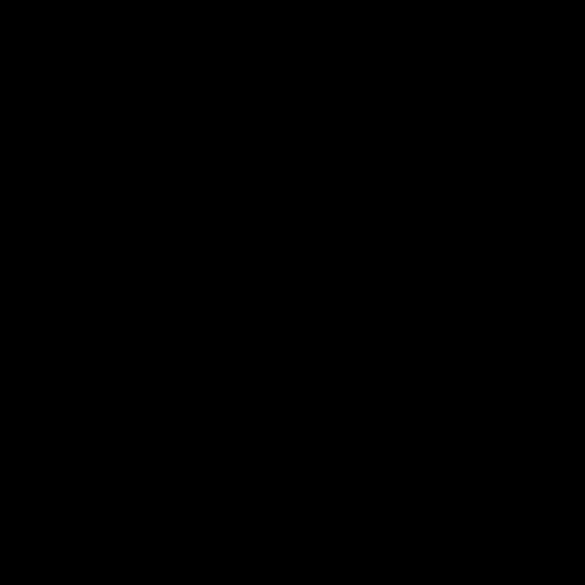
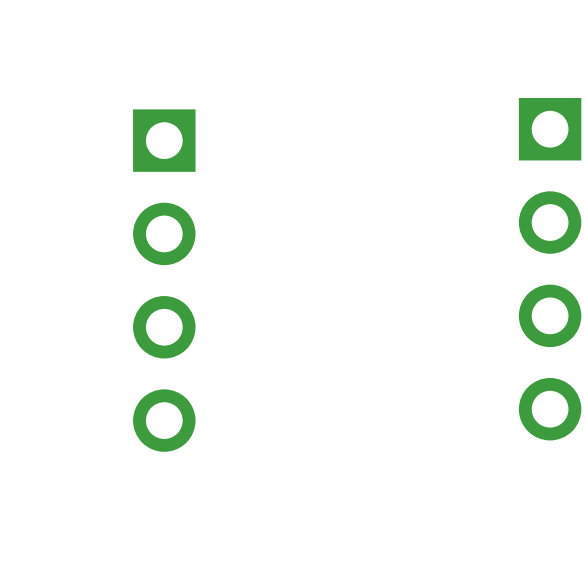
part: none -> (550, 269)
part: none -> (164, 280)

